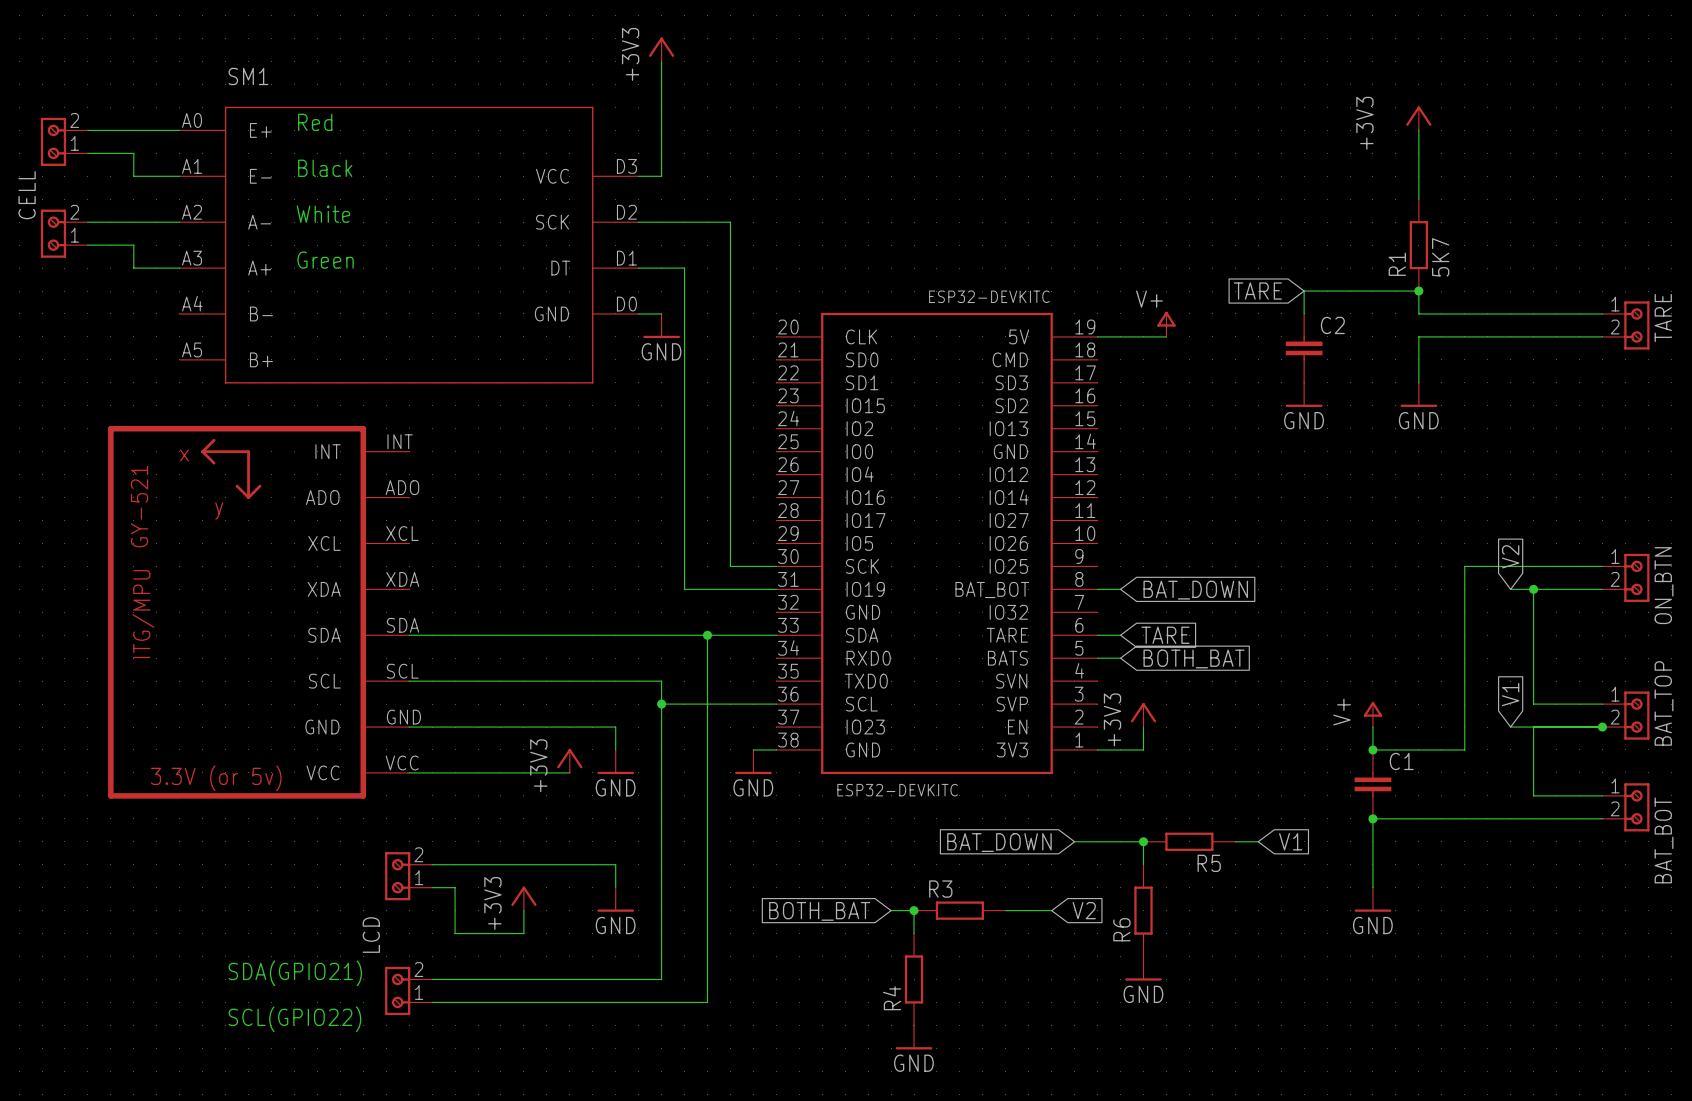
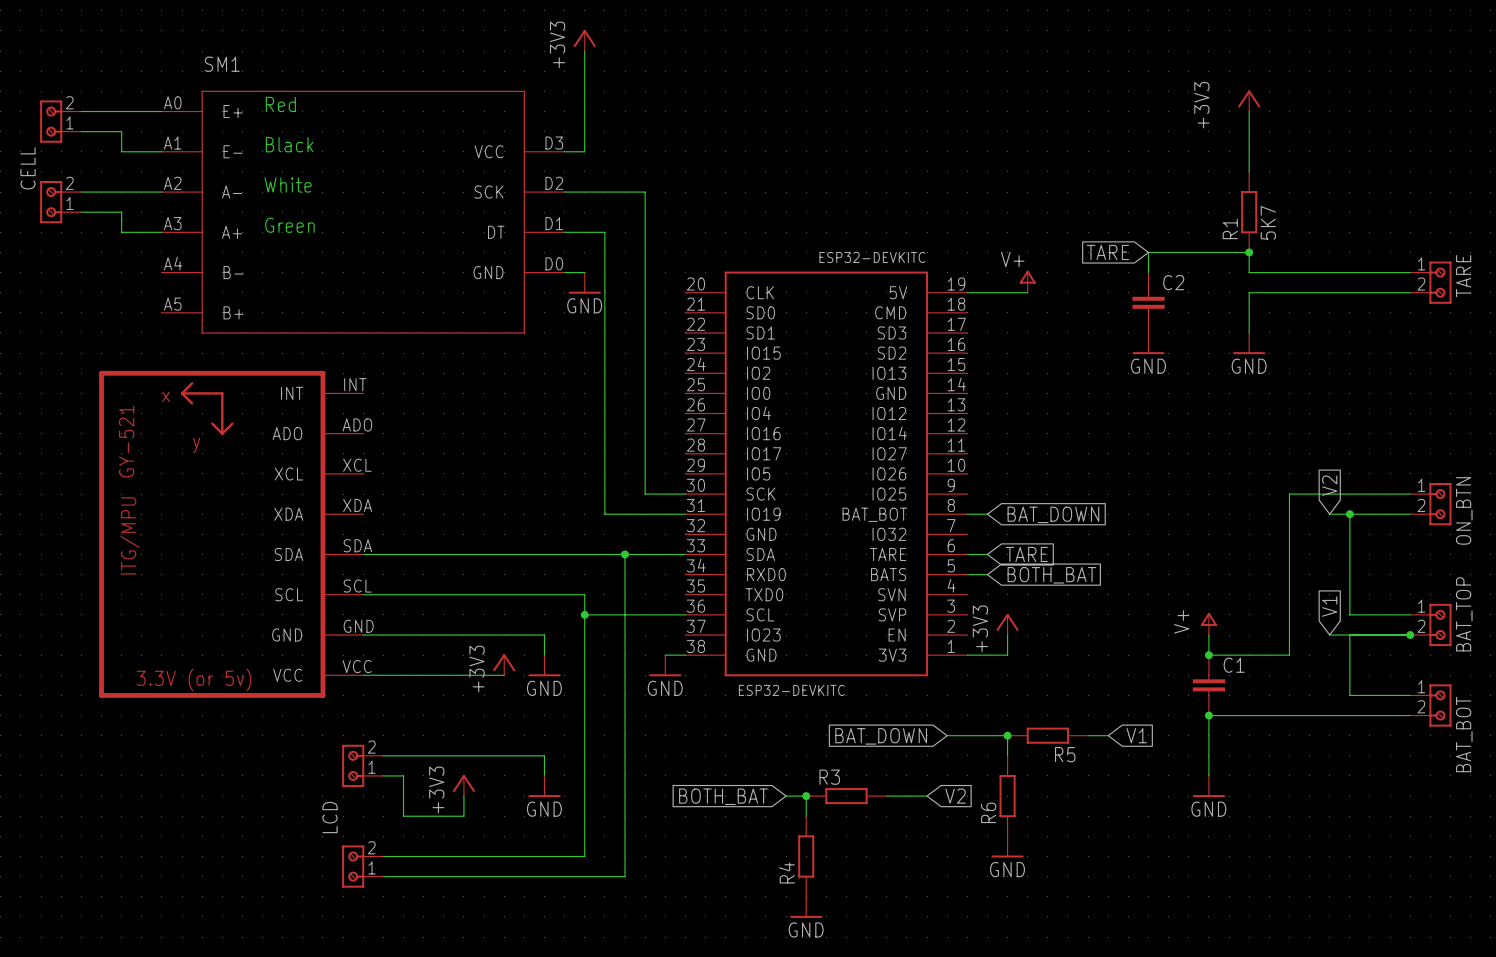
text: SDA(GPIO21) (295, 973) -> none
text: SCL(GPIO22) (294, 1019) -> none

